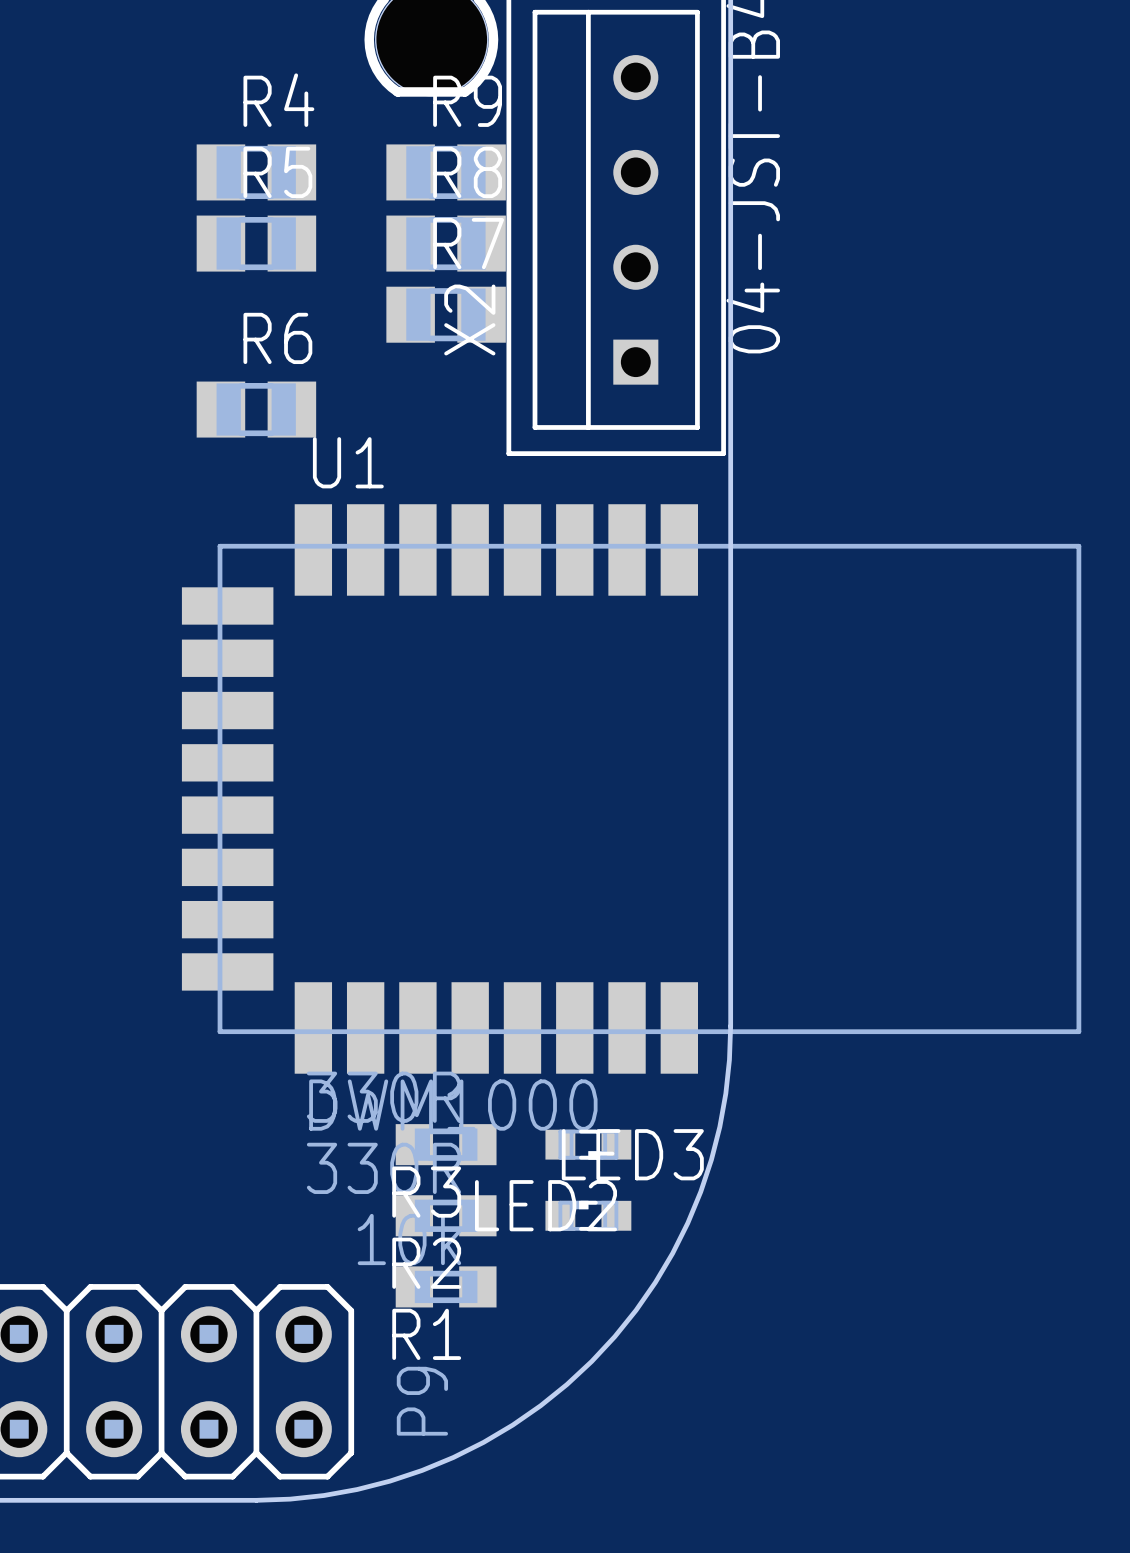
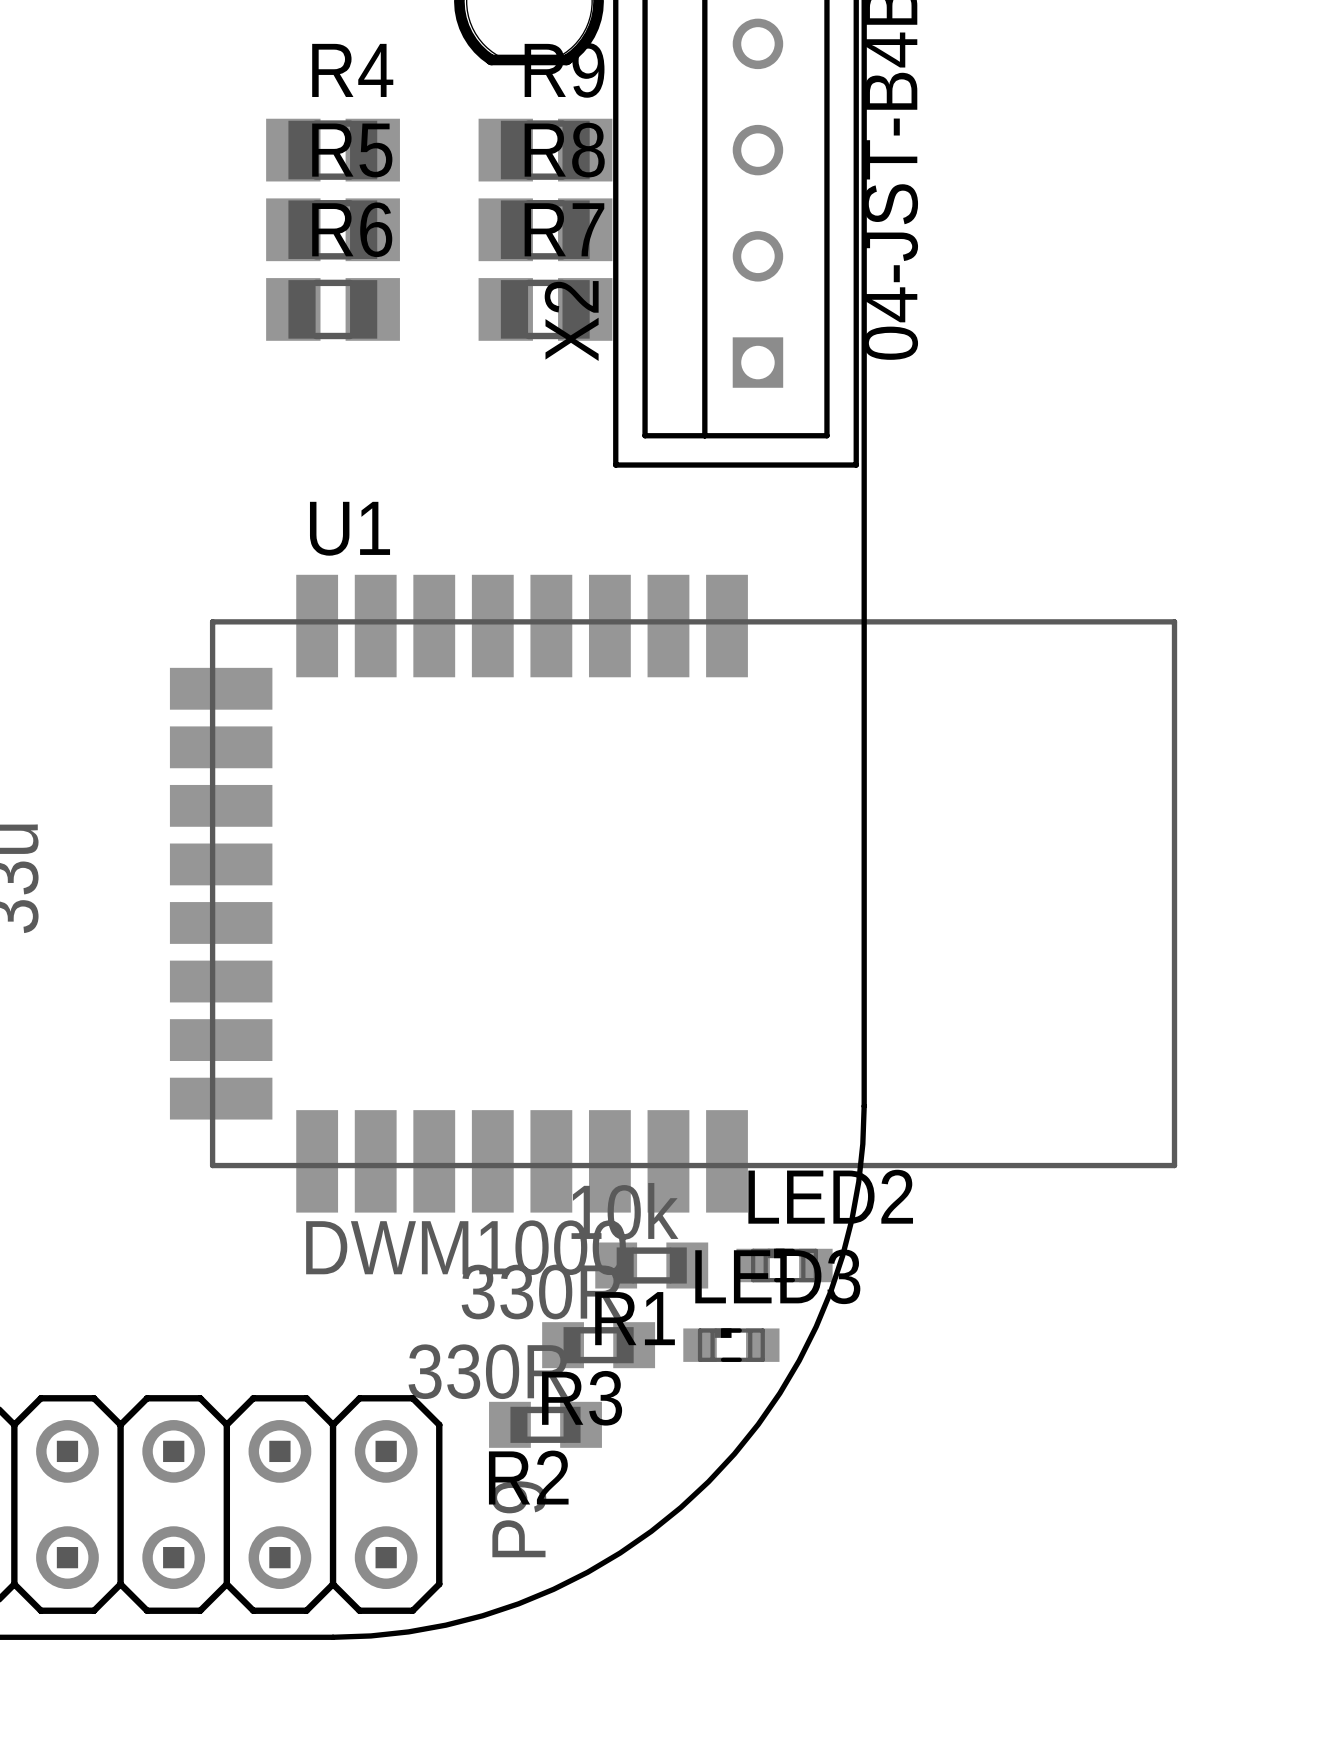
R6 position: (256, 409) -> (333, 309)
U1 position: (631, 788) -> (673, 893)
R3 position: (446, 1144) -> (598, 1345)
LED2 rotation: 0° (588, 1144) -> 180° (784, 1265)
LED2 position: (588, 1144) -> (784, 1265)
R2 position: (446, 1215) -> (545, 1424)
LED3 position: (588, 1215) -> (731, 1345)
R1 position: (446, 1286) -> (651, 1265)

